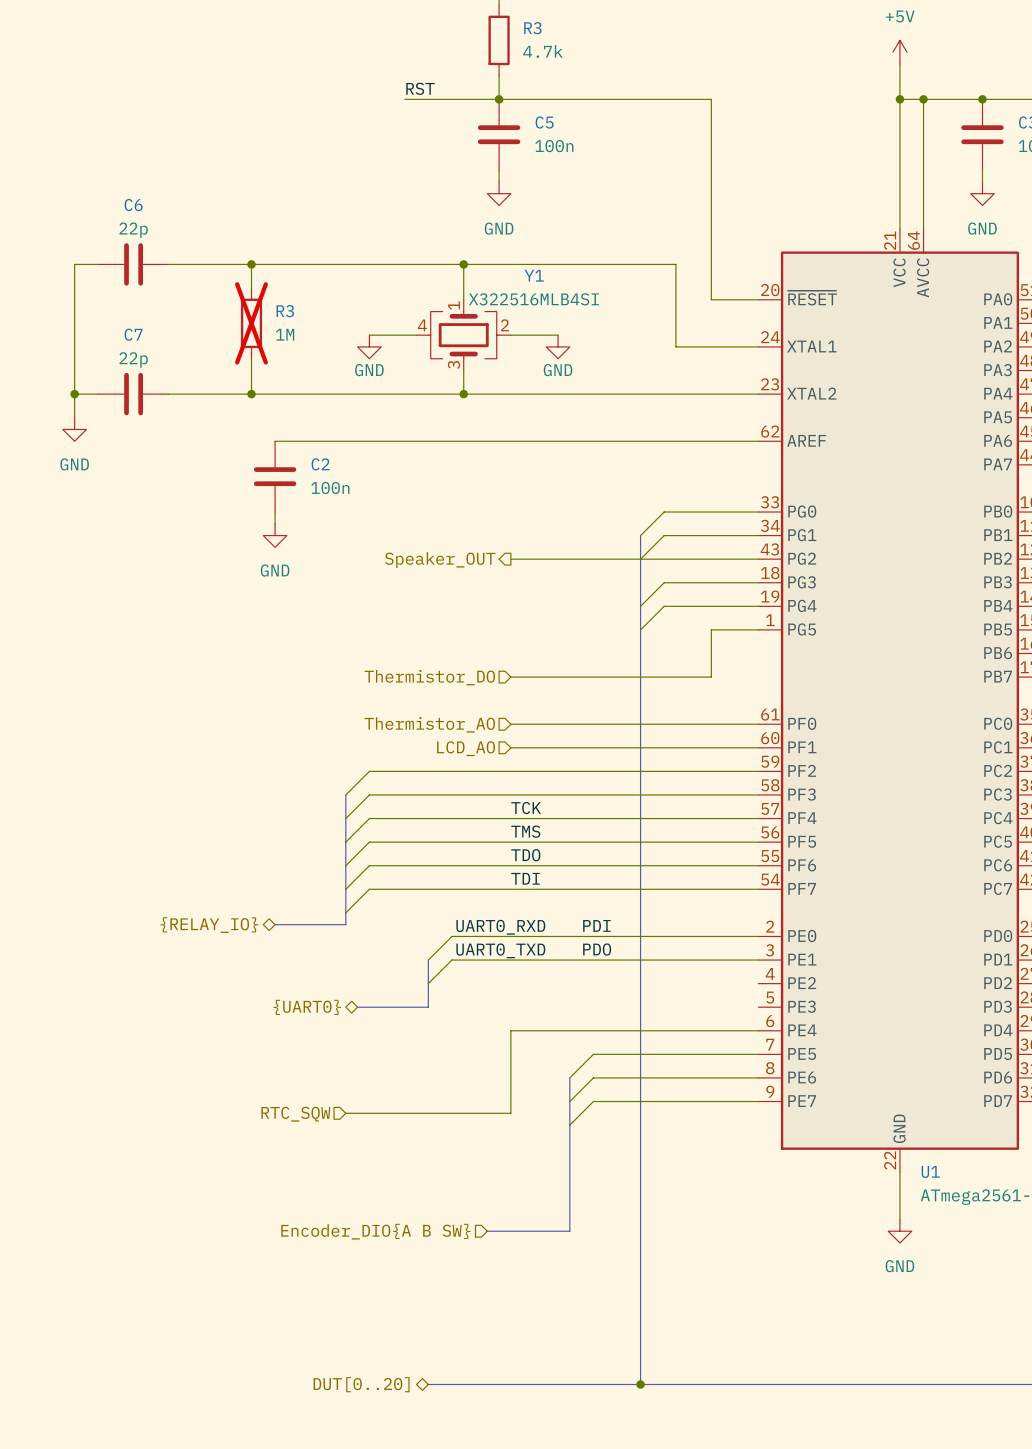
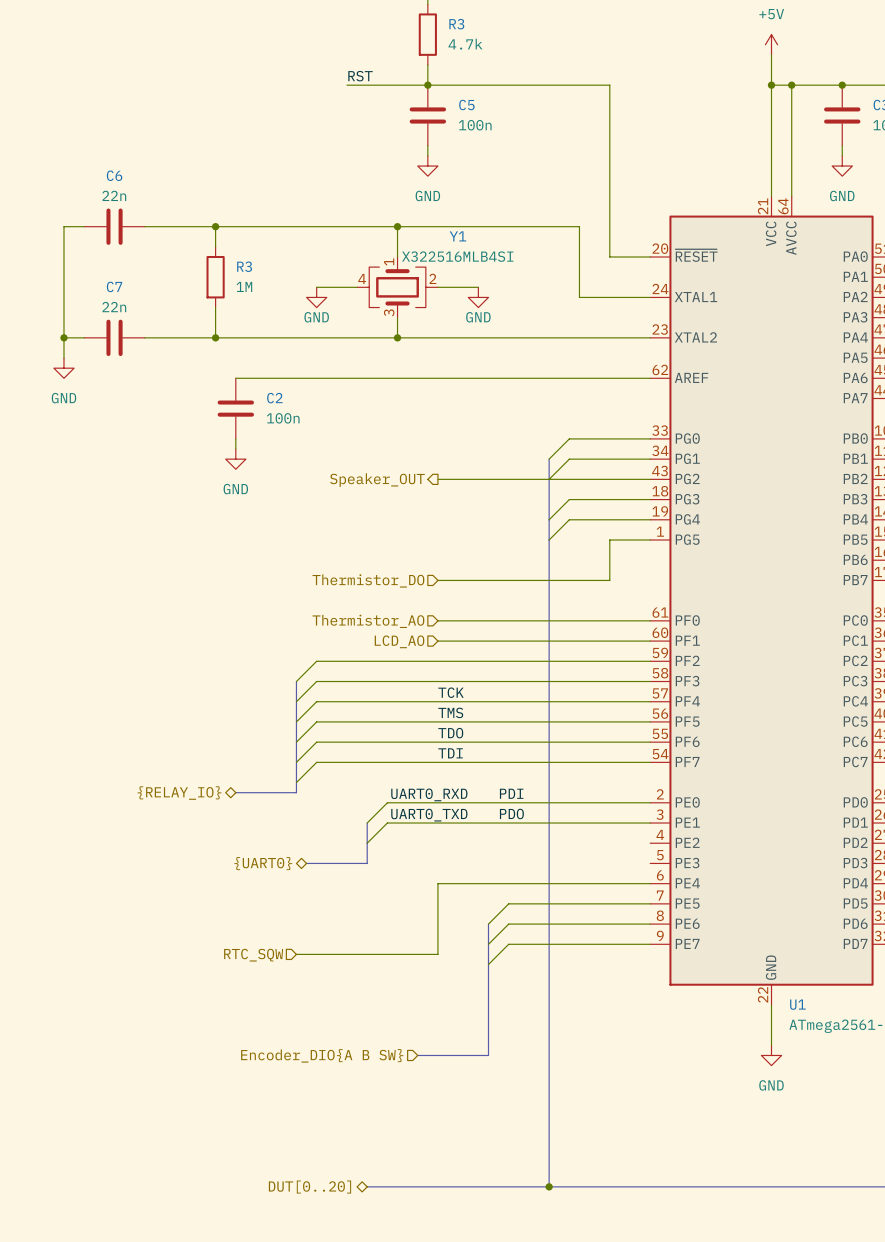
C6 value: 22p (133, 230) -> 22n (114, 195)
R3 do-not-place cross: (251, 323) -> none
C7 value: 22p (133, 359) -> 22n (114, 307)

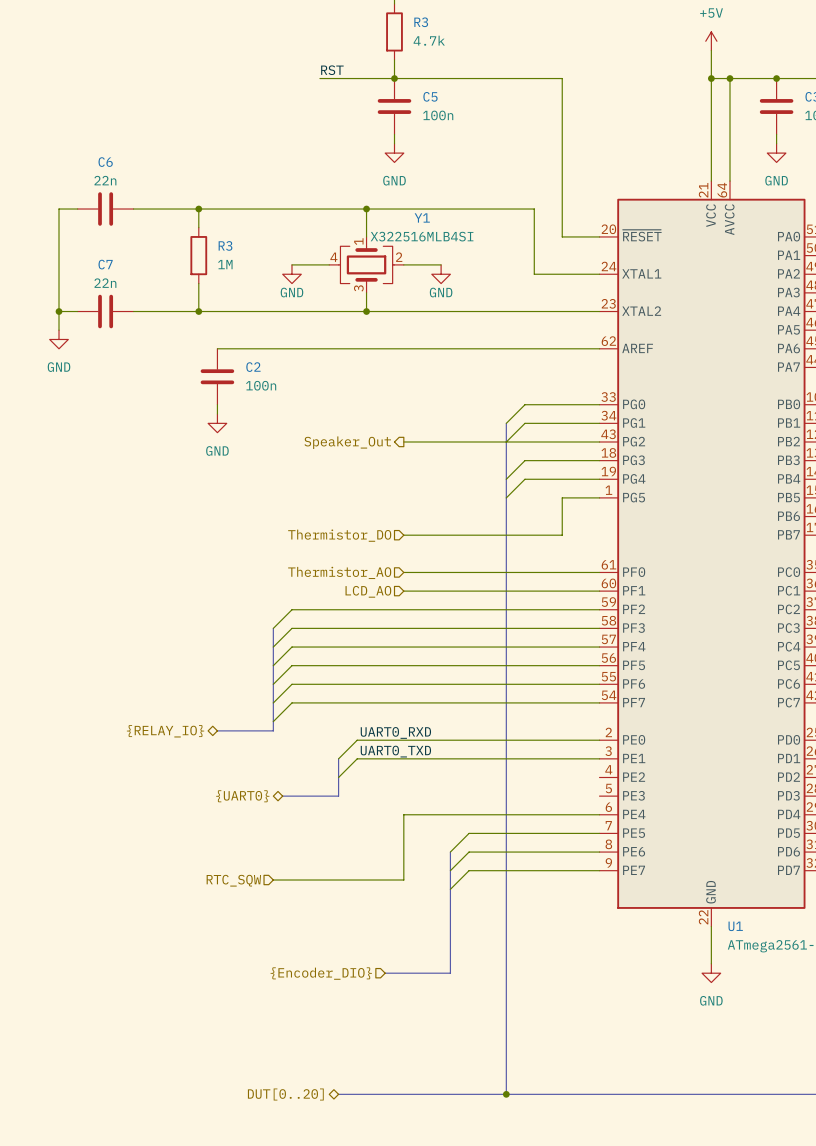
hierarchical label: Speaker_OUT (377, 480) -> Speaker_Out (347, 442)
label: TCK (451, 692) -> none
label: TMS (450, 712) -> none
label: TDO (450, 733) -> none
label: TDI (450, 753) -> none
label: PDI (511, 793) -> none
label: PDO (511, 813) -> none
hierarchical label: Encoder_DIO{A B SW} (322, 1055) -> {Encoder_DIO} (321, 973)

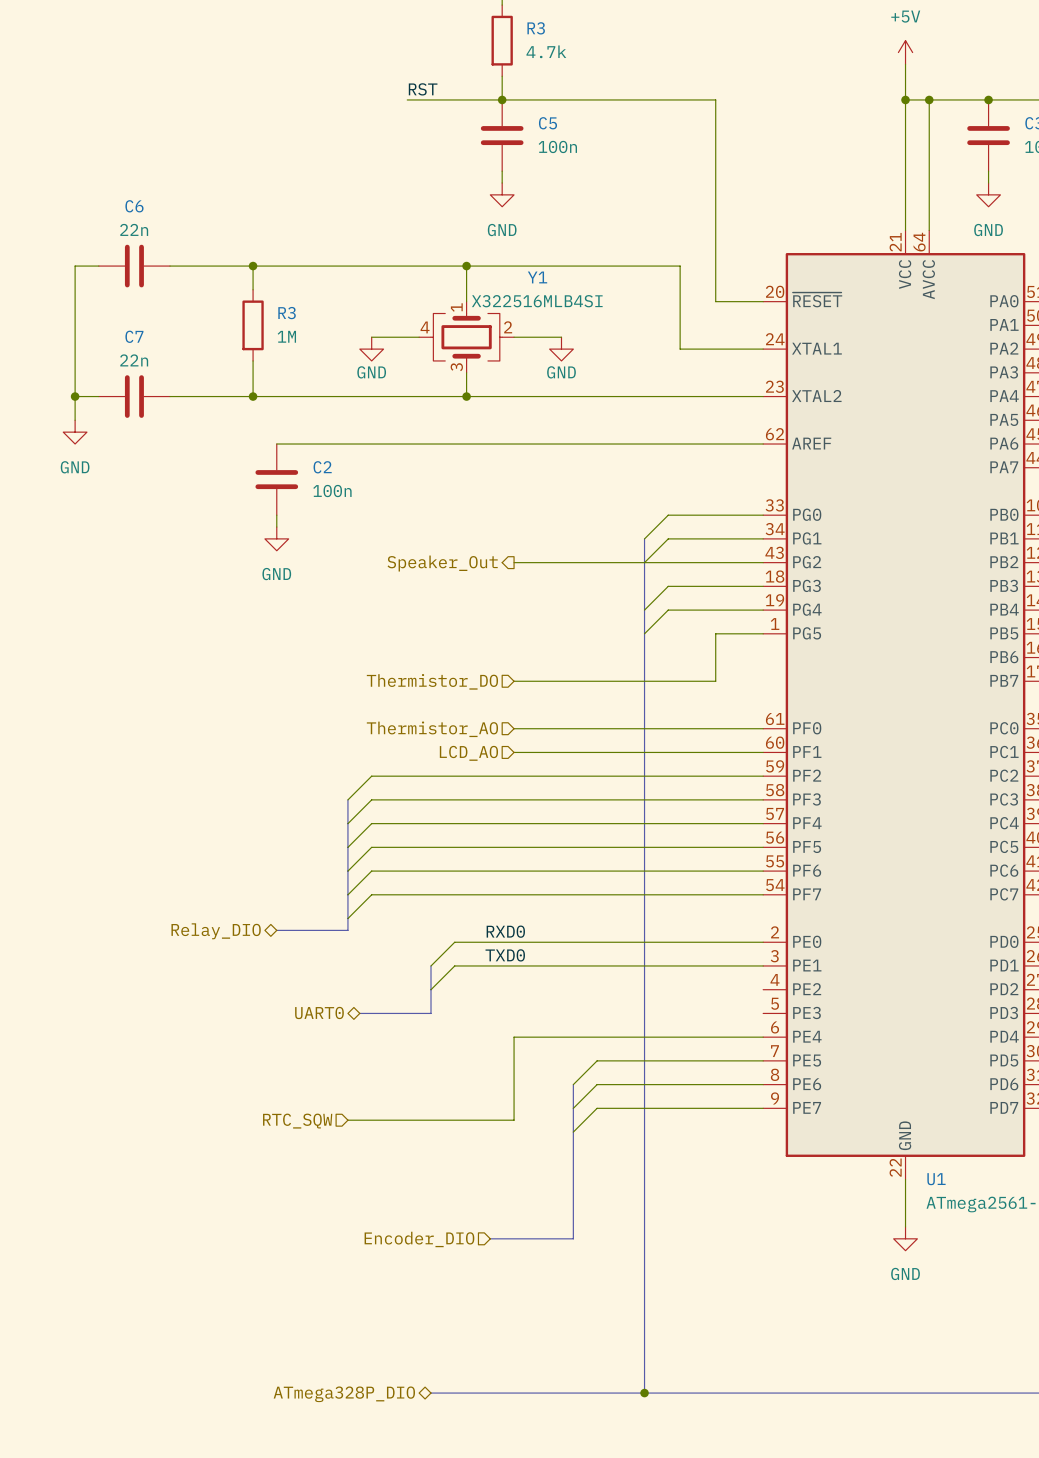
hierarchical label: {RELAY_IO} (165, 731) -> Relay_DIO (216, 931)
label: none -> RXD0 (505, 931)
label: UART0_RXD (395, 732) -> none
label: none -> TXD0 (505, 955)
label: UART0_TXD (395, 751) -> none
hierarchical label: {UART0} (242, 796) -> UART0 (319, 1012)
hierarchical label: {Encoder_DIO} (321, 973) -> Encoder_DIO (419, 1239)
hierarchical label: DUT[0..20] (285, 1094) -> ATmega328P_DIO (344, 1394)

